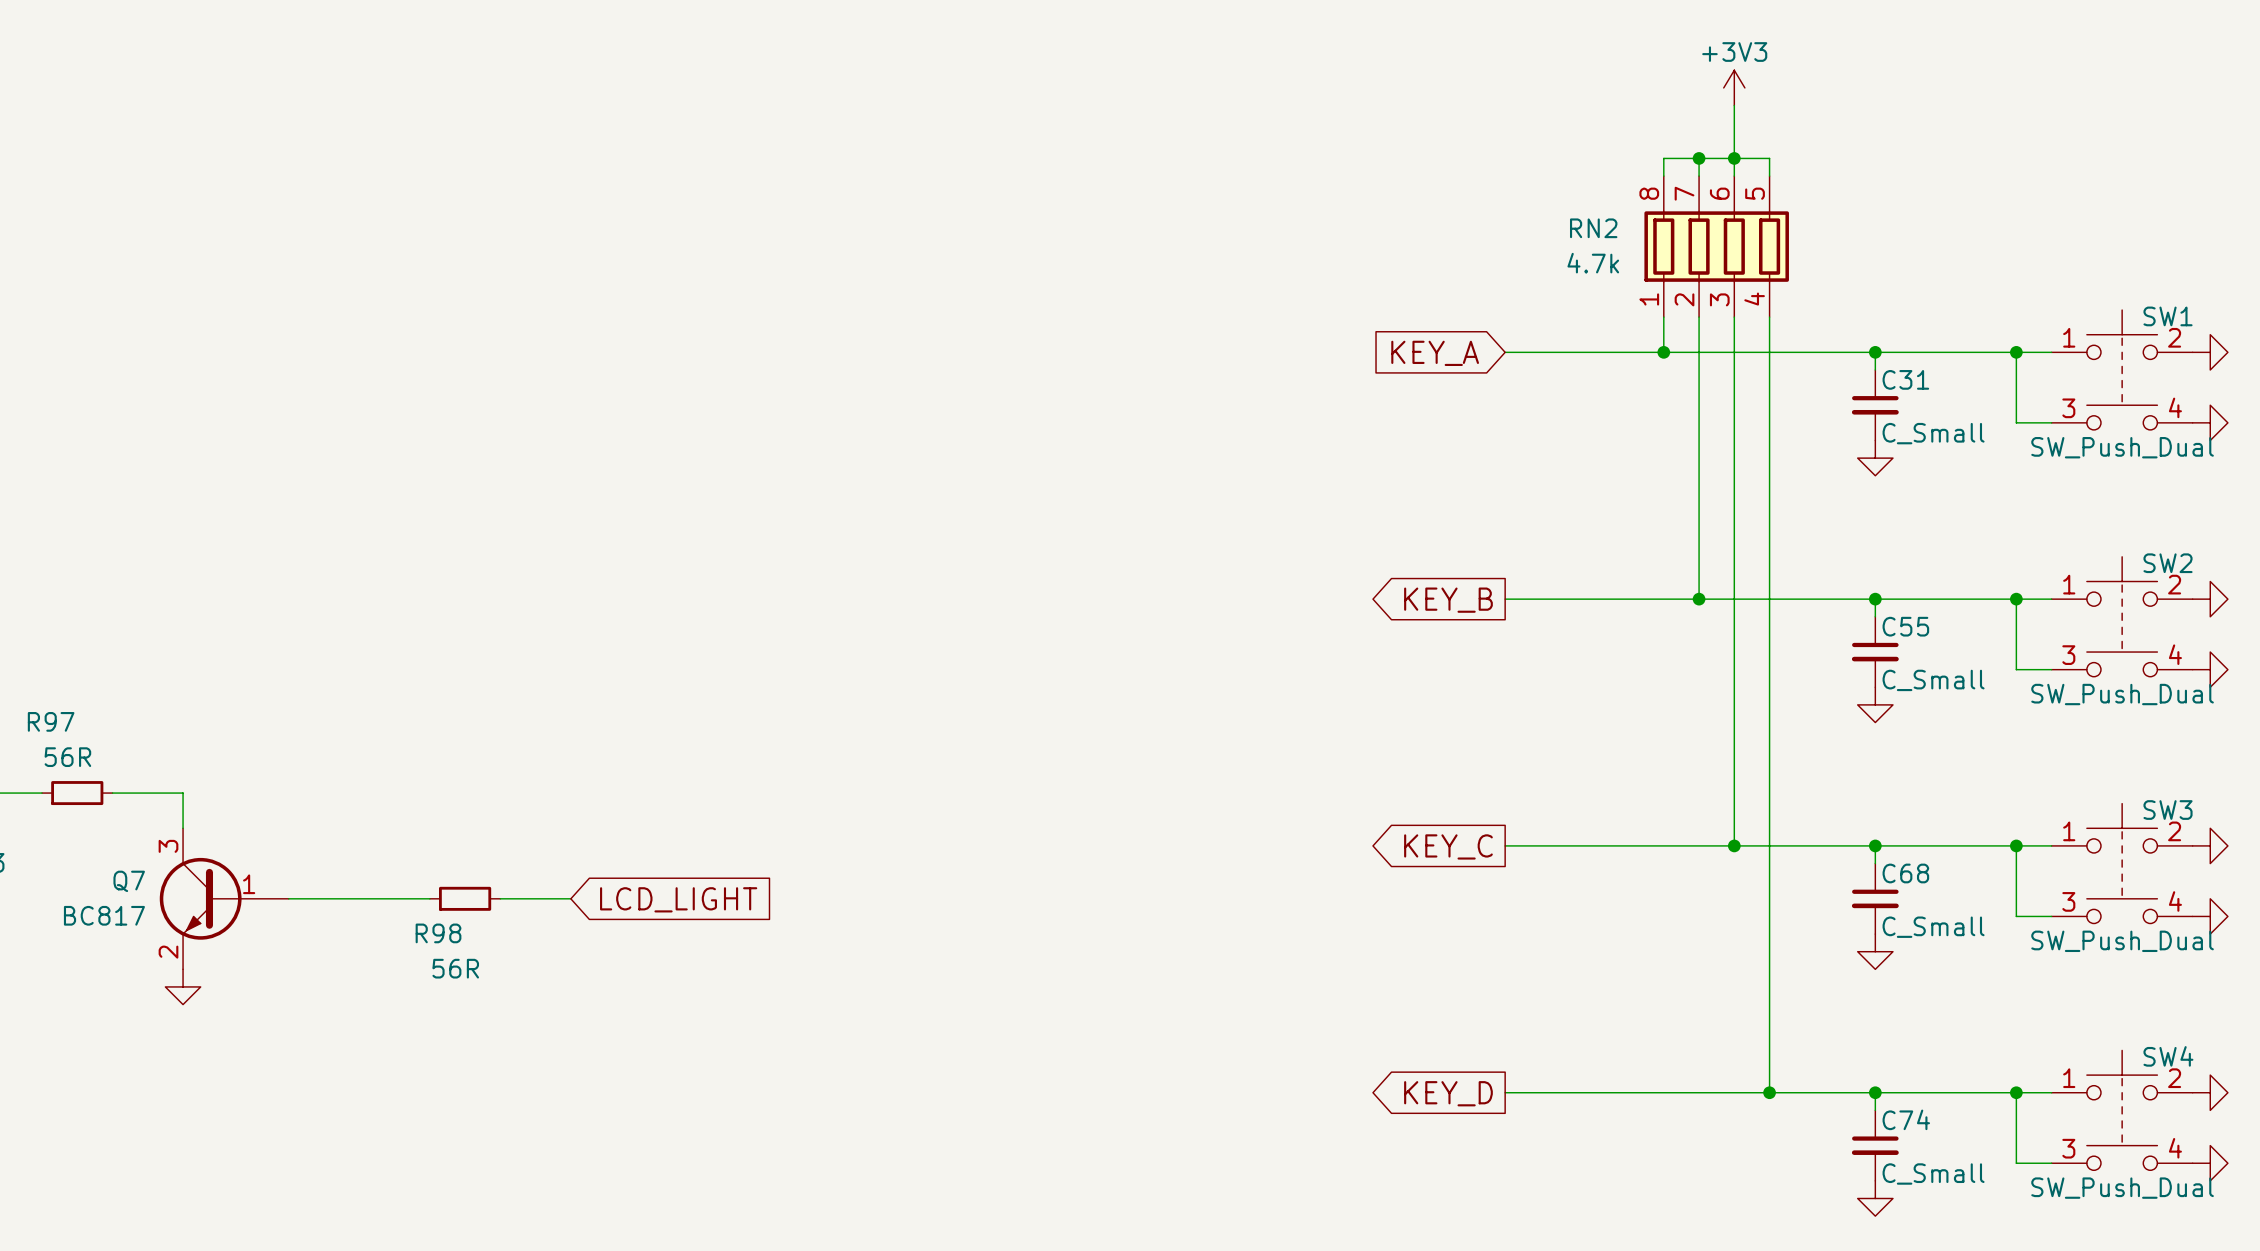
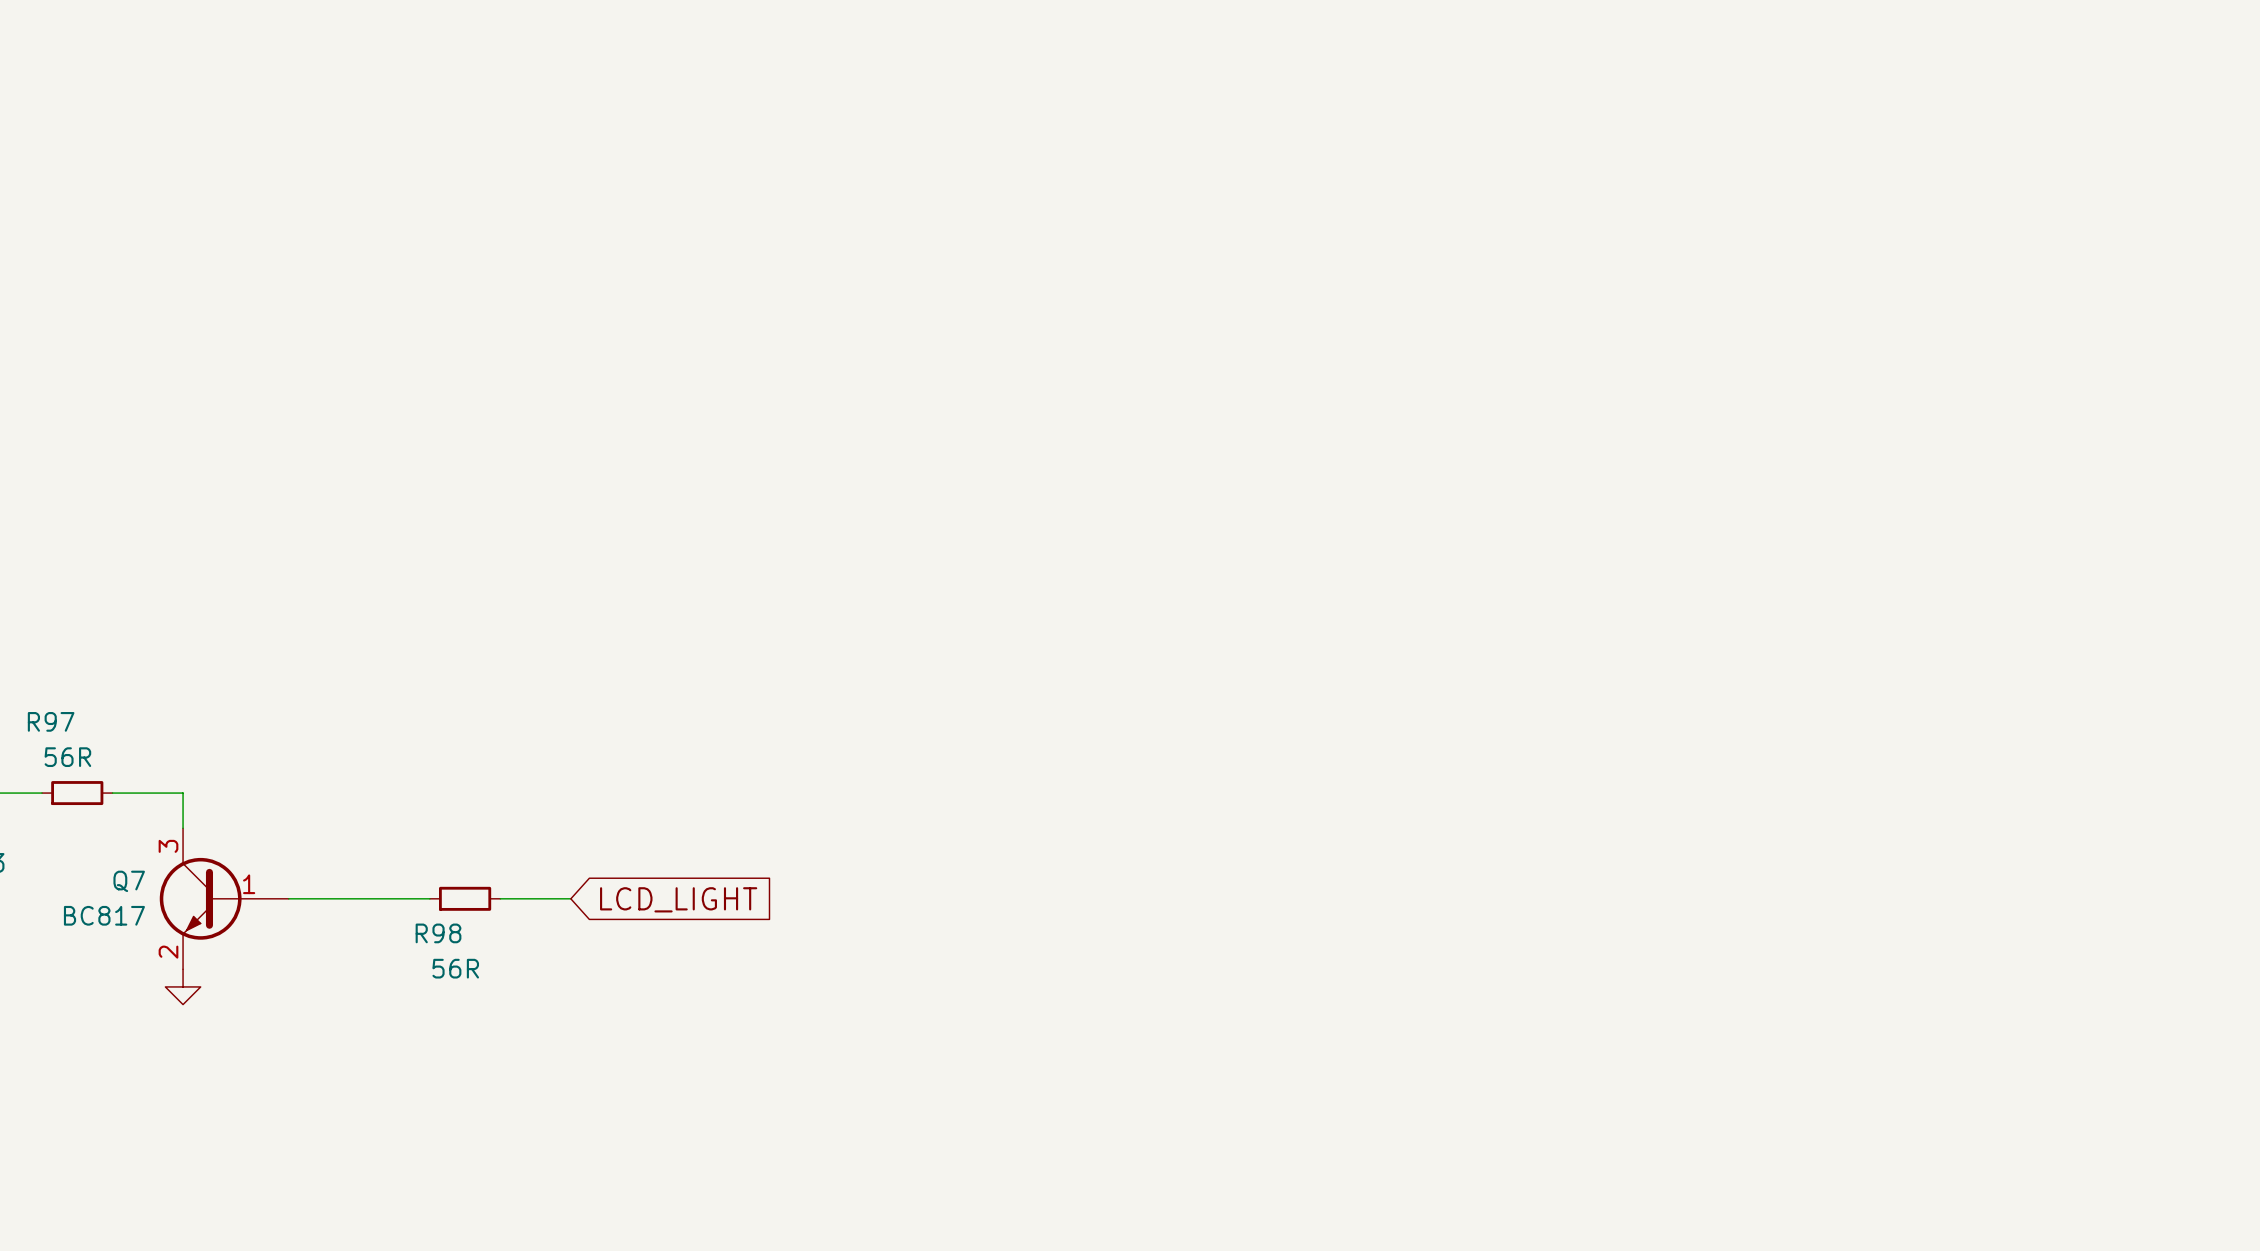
power symbol: +3V3 (1734, 87) -> none
wire: (1734, 105) (1734, 176) -> none
wire: (1699, 158) (1699, 176) -> none
junction: (1699, 158) -> none
junction: (1734, 158) -> none
wire: (1663, 176) (1663, 158) (1769, 158) (1769, 176) -> none
RN2: 4.7k (1716, 246) -> none
wire: (1663, 317) (1663, 352) -> none
wire: (1699, 317) (1699, 599) -> none
wire: (1734, 317) (1734, 845) -> none
wire: (1769, 317) (1769, 1092) -> none
wire: (1505, 352) (2051, 352) -> none
junction: (1663, 352) -> none
wire: (1875, 352) (1875, 369) -> none
junction: (1875, 352) -> none
wire: (2016, 352) (2016, 422) (2051, 422) -> none
junction: (2016, 352) -> none
power symbol: (2210, 352) -> none
global label: KEY_A (1435, 353) -> none
SW1: SW_Push_Dual (2122, 369) -> none
C31: C_Small (1875, 405) -> none
power symbol: (2210, 422) -> none
power symbol: (1875, 458) -> none
wire: (1505, 599) (2051, 599) -> none
junction: (1699, 599) -> none
wire: (1875, 599) (1875, 616) -> none
junction: (1875, 599) -> none
wire: (2016, 599) (2016, 669) (2051, 669) -> none
junction: (2016, 599) -> none
power symbol: (2210, 599) -> none
global label: KEY_B (1448, 600) -> none
SW2: SW_Push_Dual (2122, 616) -> none
C55: C_Small (1875, 652) -> none
power symbol: (2210, 669) -> none
power symbol: (1875, 704) -> none
wire: (1505, 845) (2051, 845) -> none
junction: (1734, 845) -> none
wire: (1875, 845) (1875, 863) -> none
junction: (1875, 845) -> none
wire: (2016, 845) (2016, 916) (2051, 916) -> none
junction: (2016, 845) -> none
power symbol: (2210, 845) -> none
global label: KEY_C (1448, 846) -> none
SW3: SW_Push_Dual (2122, 863) -> none
C68: C_Small (1875, 898) -> none
power symbol: (2210, 916) -> none
power symbol: (1875, 951) -> none
wire: (1505, 1092) (2051, 1092) -> none
junction: (1769, 1092) -> none
wire: (1875, 1092) (1875, 1110) -> none
junction: (1875, 1092) -> none
wire: (2016, 1092) (2016, 1163) (2051, 1163) -> none
junction: (2016, 1092) -> none
power symbol: (2210, 1092) -> none
global label: KEY_D (1448, 1093) -> none
SW4: SW_Push_Dual (2122, 1110) -> none
C74: C_Small (1875, 1145) -> none
power symbol: (2210, 1163) -> none
power symbol: (1875, 1198) -> none

